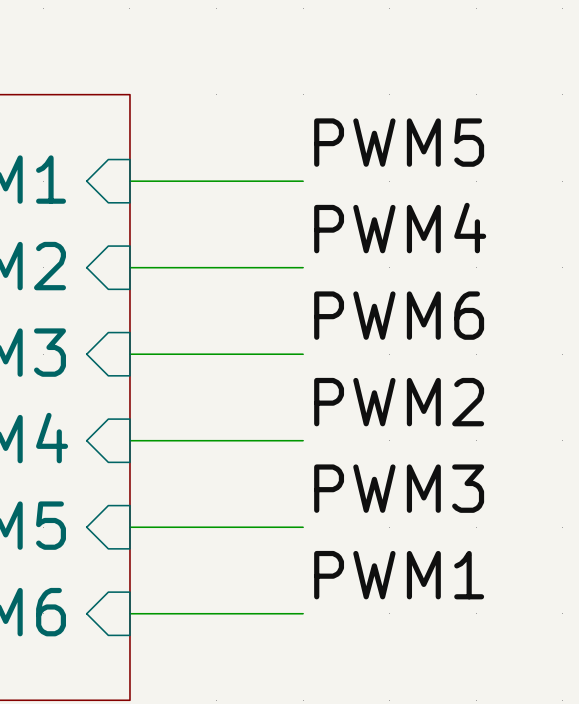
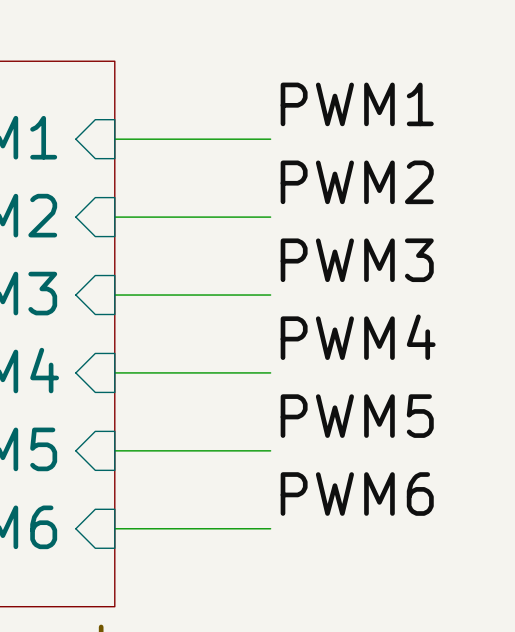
label: PWM5 (399, 142) -> PWM1 (357, 104)
label: PWM4 (400, 228) -> PWM2 (357, 182)
label: PWM6 (399, 315) -> PWM3 (357, 260)
label: PWM2 (399, 402) -> PWM4 (358, 337)
label: PWM3 (399, 488) -> PWM5 (357, 416)
label: PWM1 (399, 575) -> PWM6 (357, 494)

